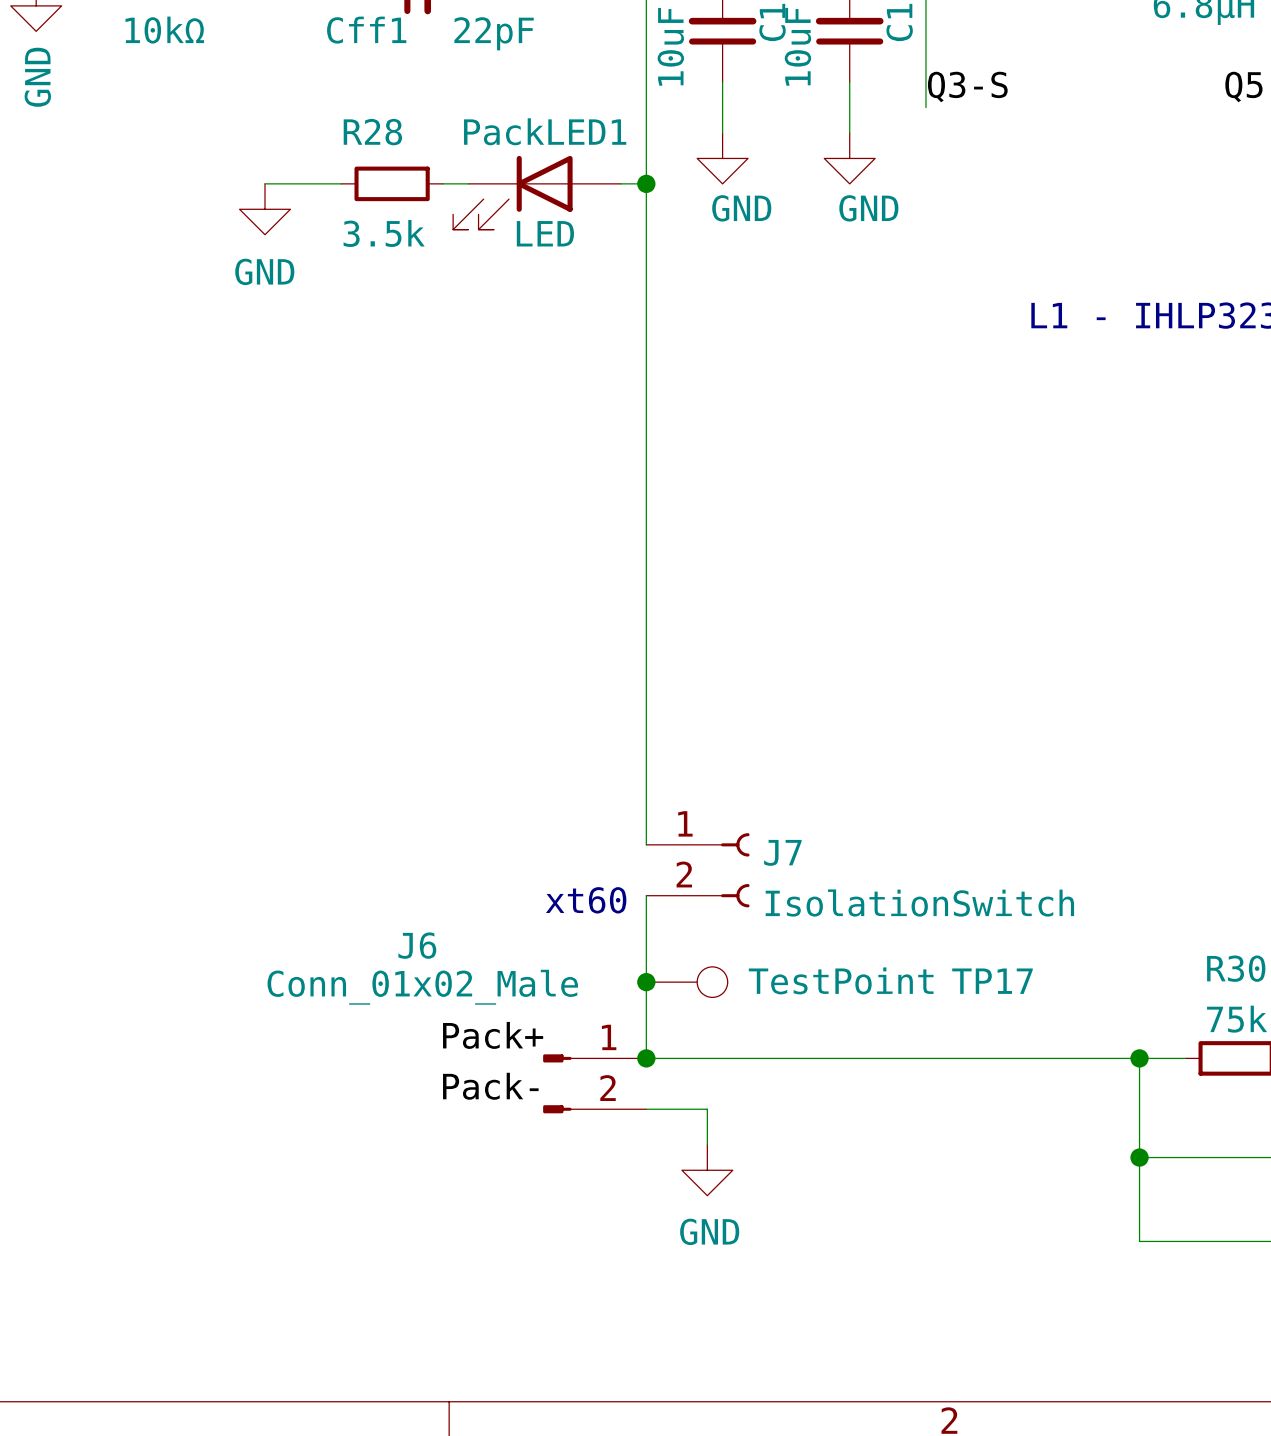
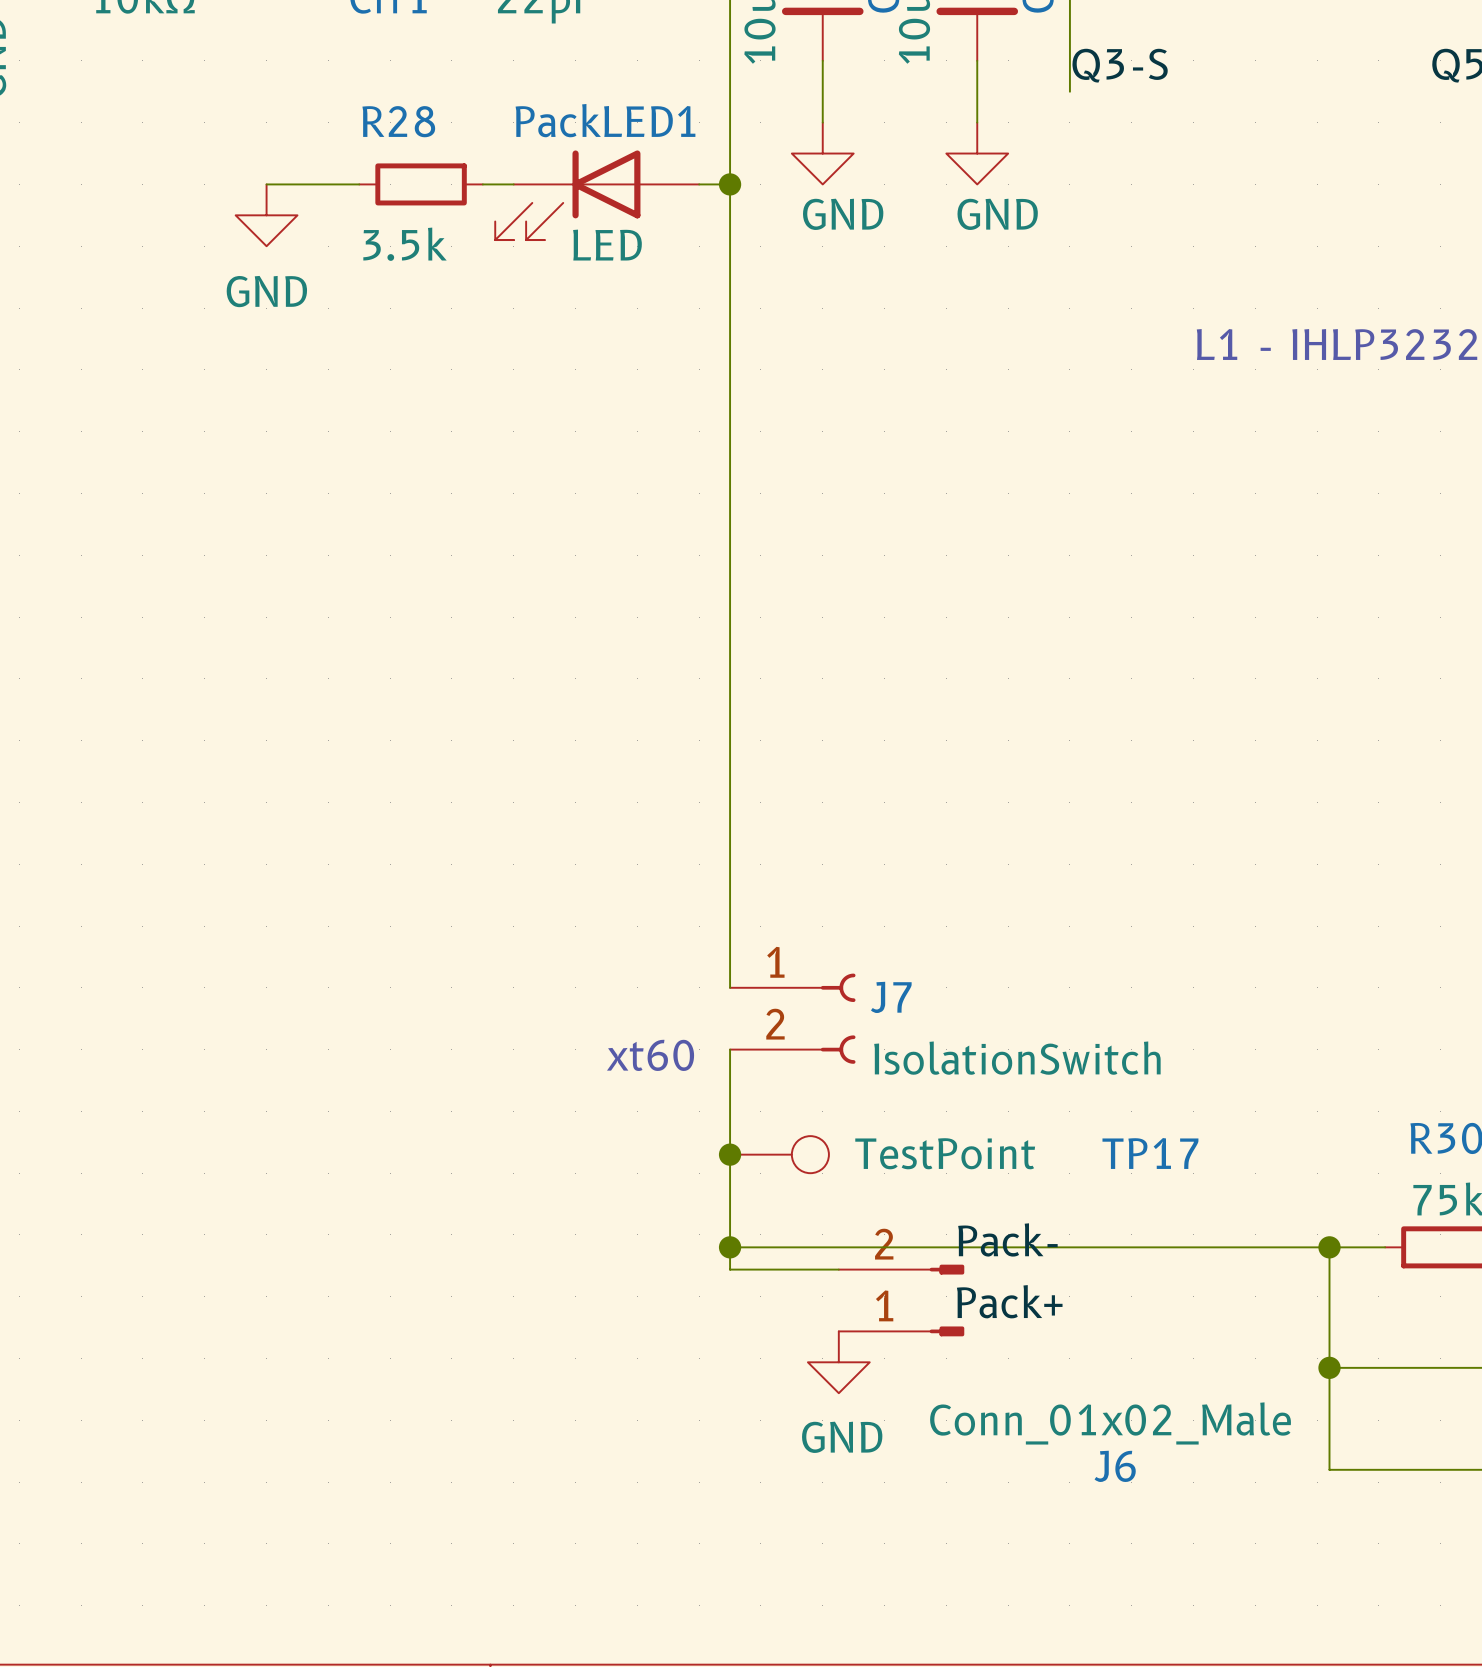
label position: Pack+ (493, 1035) -> Pack+ (1009, 1301)
wire: none -> (730, 1247) (730, 1269) (838, 1269)
J6 rotation: 0° (557, 1083) -> 180° (946, 1300)
J6 position: (594, 1083) -> (901, 1300)
label position: Pack- (490, 1086) -> Pack- (1007, 1239)
wire: (646, 1109) (707, 1109) (707, 1144) -> none
power symbol position: GND (707, 1170) -> GND (838, 1362)

